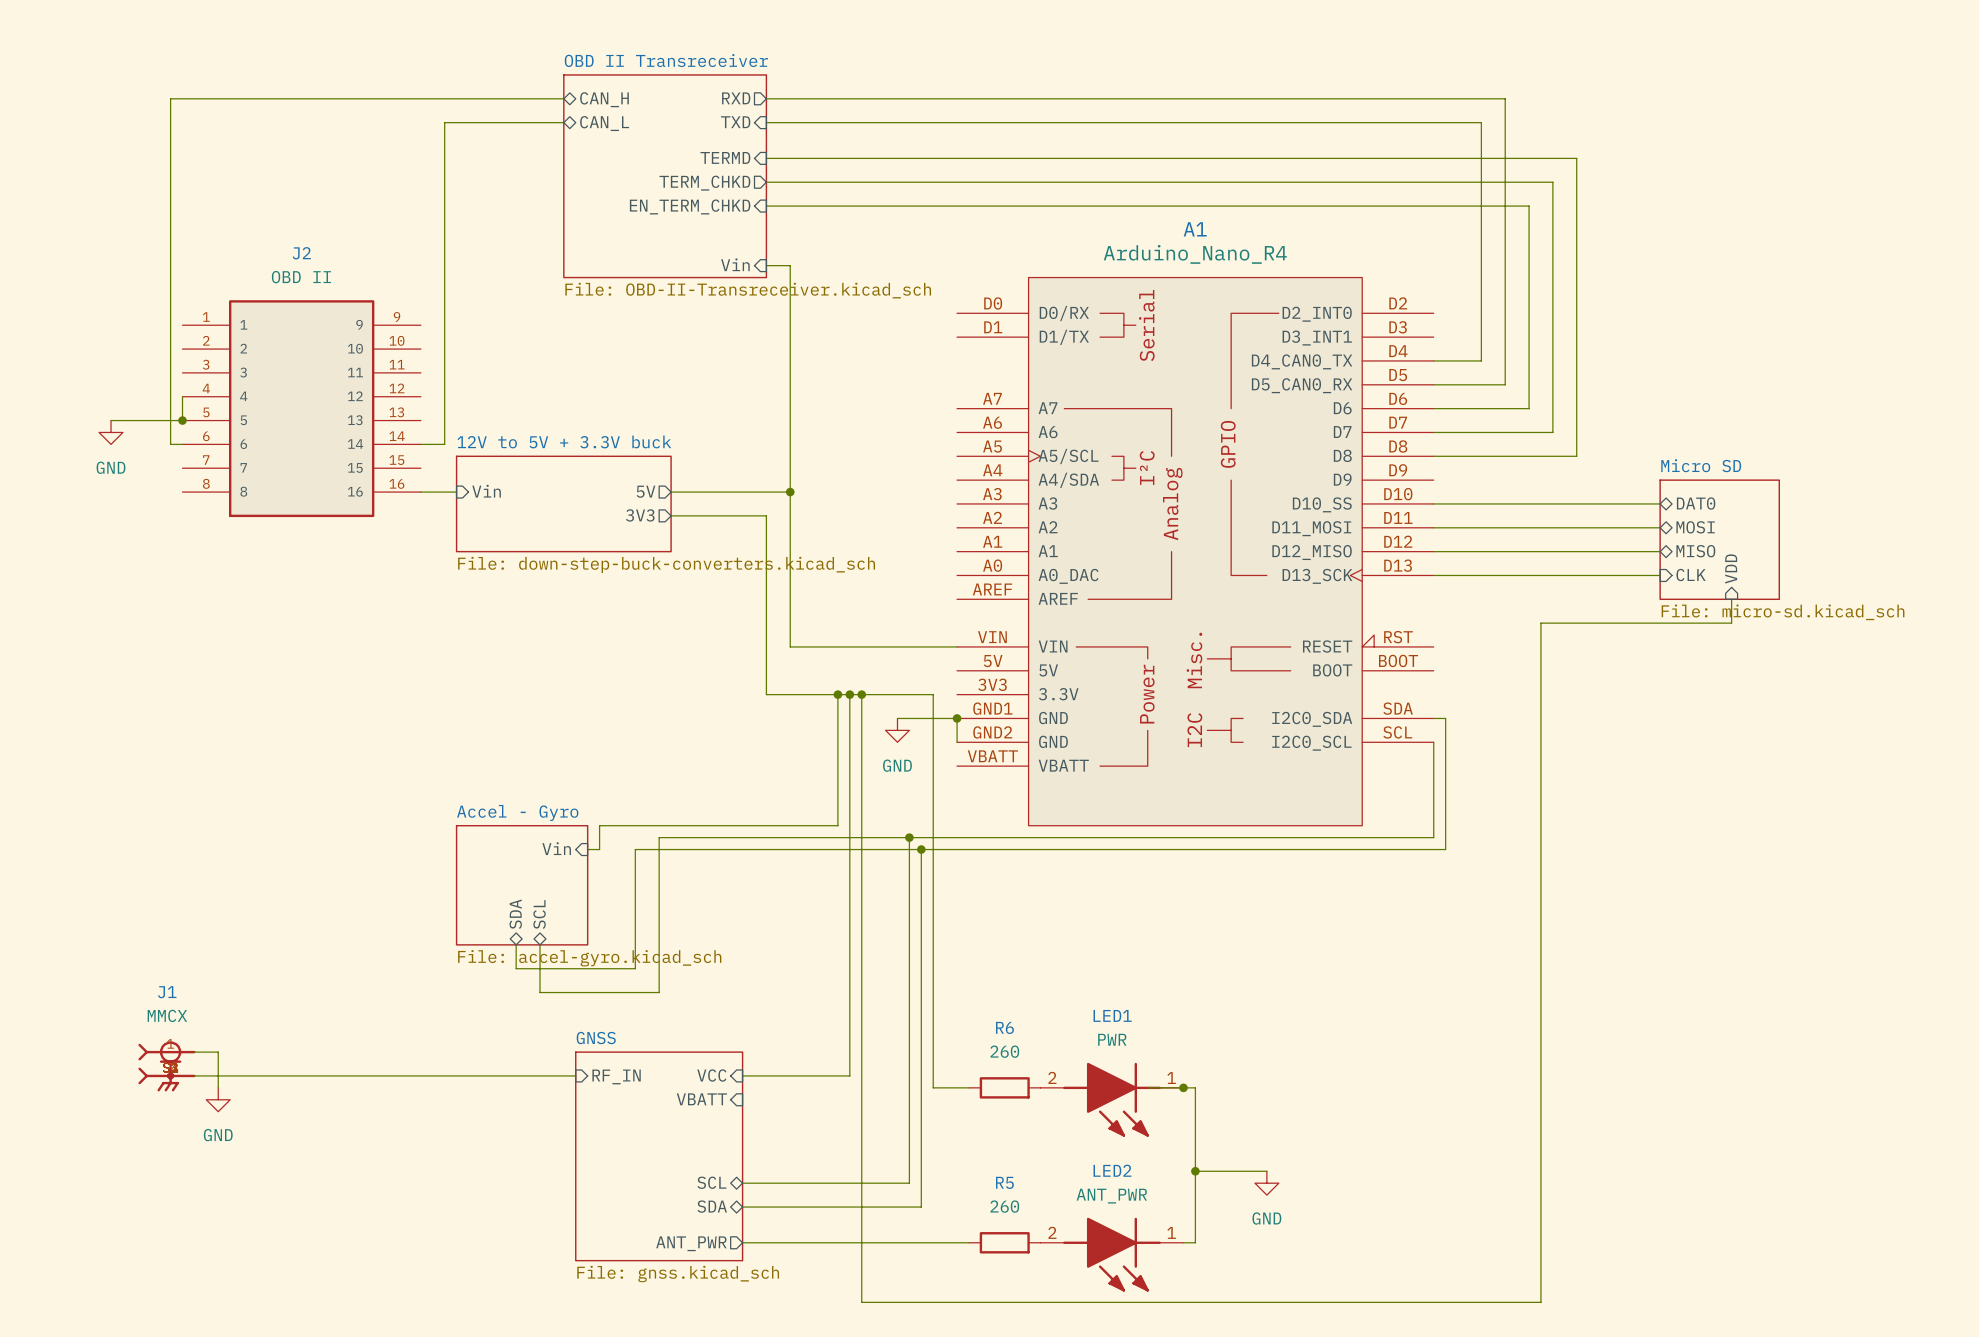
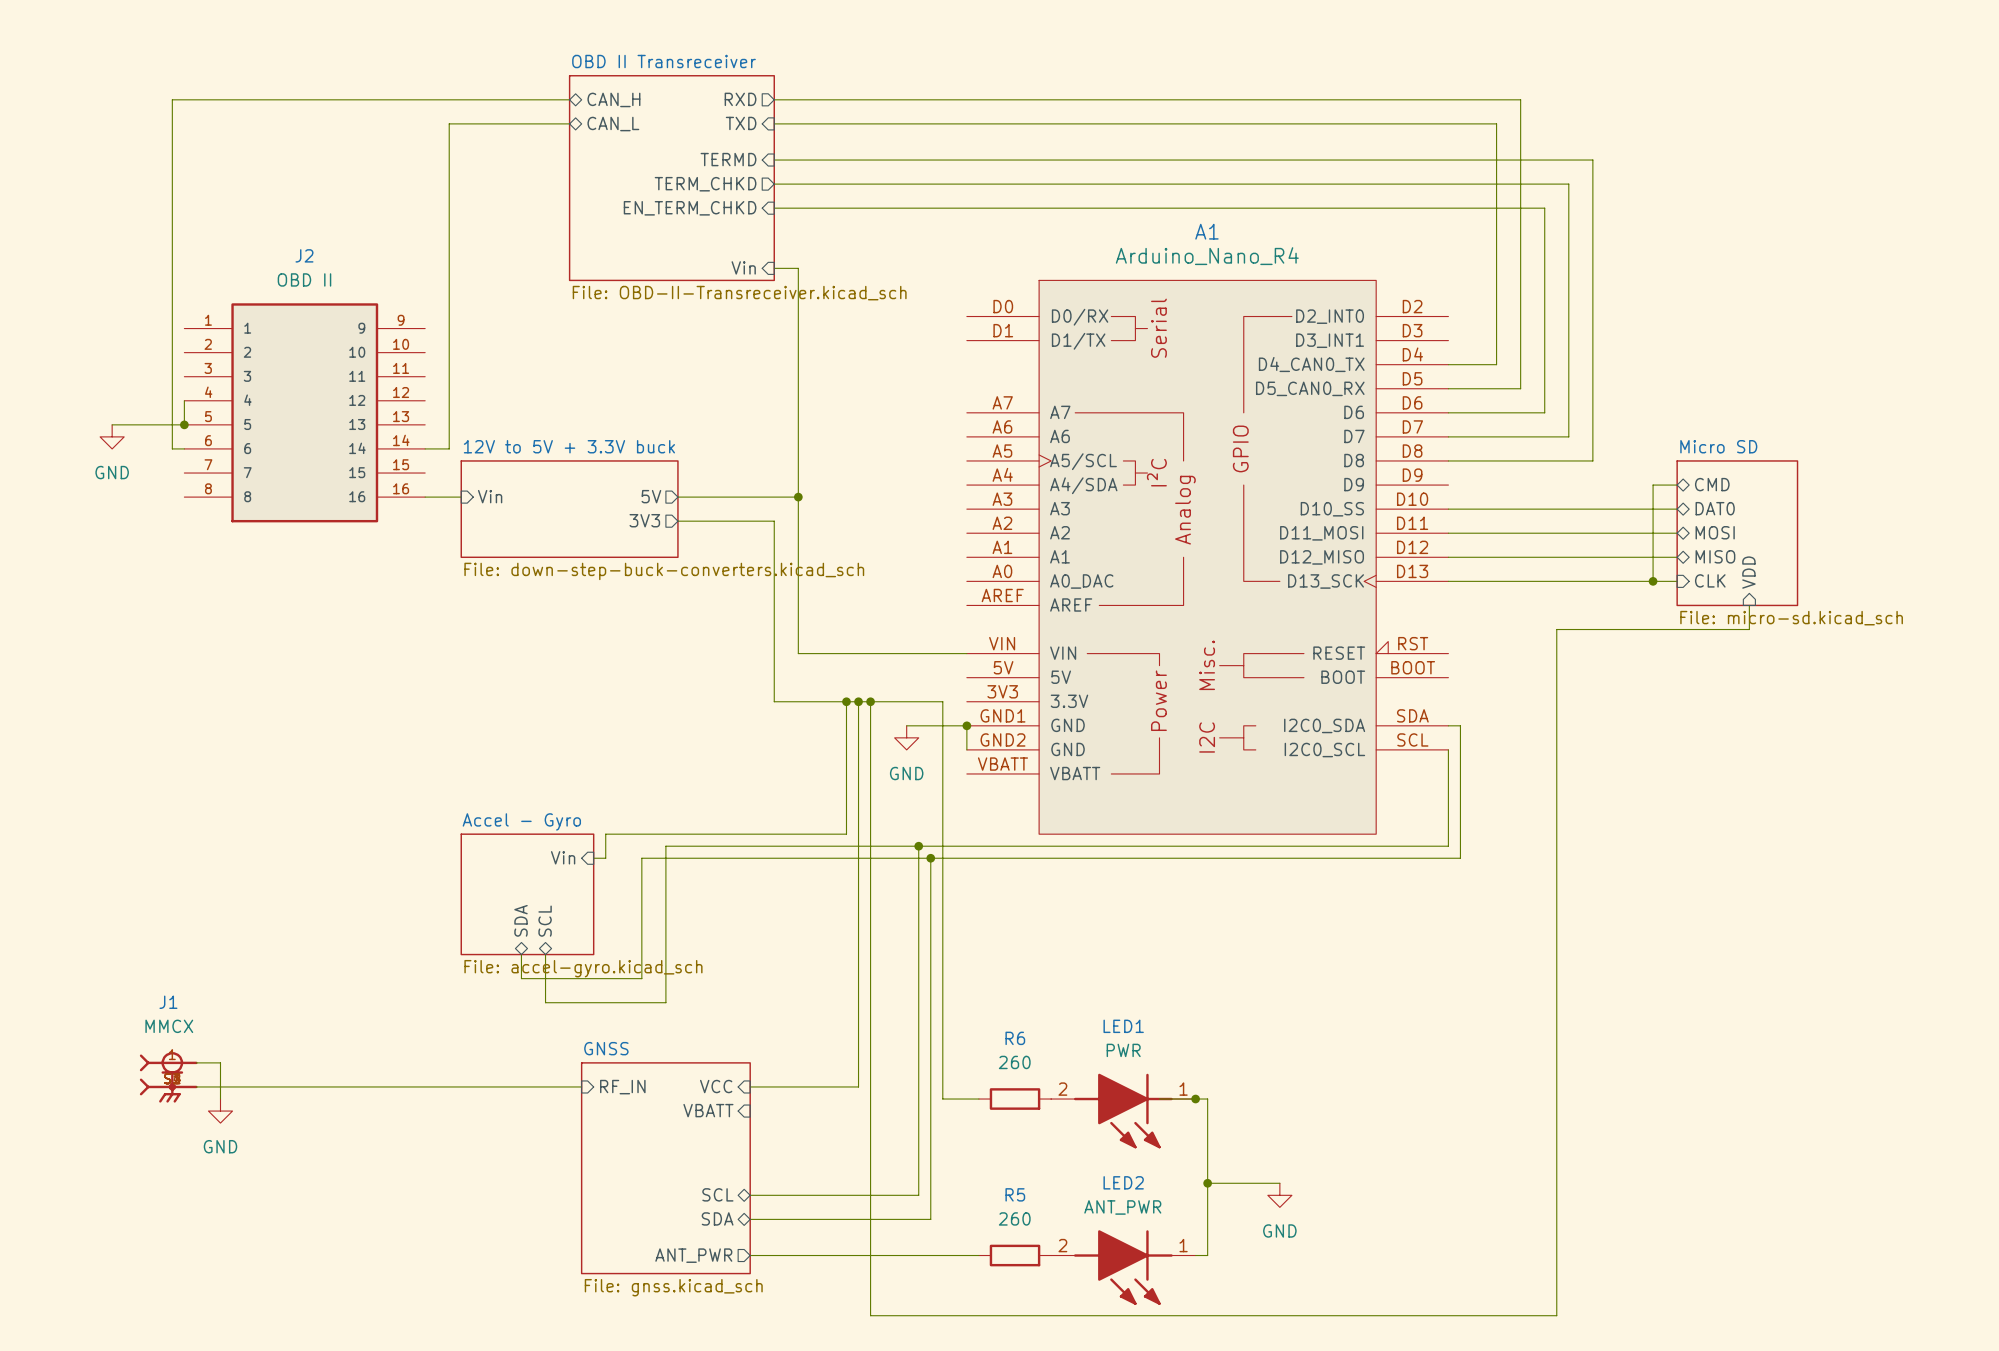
sheet pin: none -> CMD (1712, 484)
wire: none -> (1677, 485) (1653, 485) (1653, 581)
sheet Micro SD: none -> File: micro-sd.kicad_sch (1737, 533)
sheet Micro SD: File: micro-sd.kicad_sch (1719, 539) -> none
junction: none -> (1653, 581)

